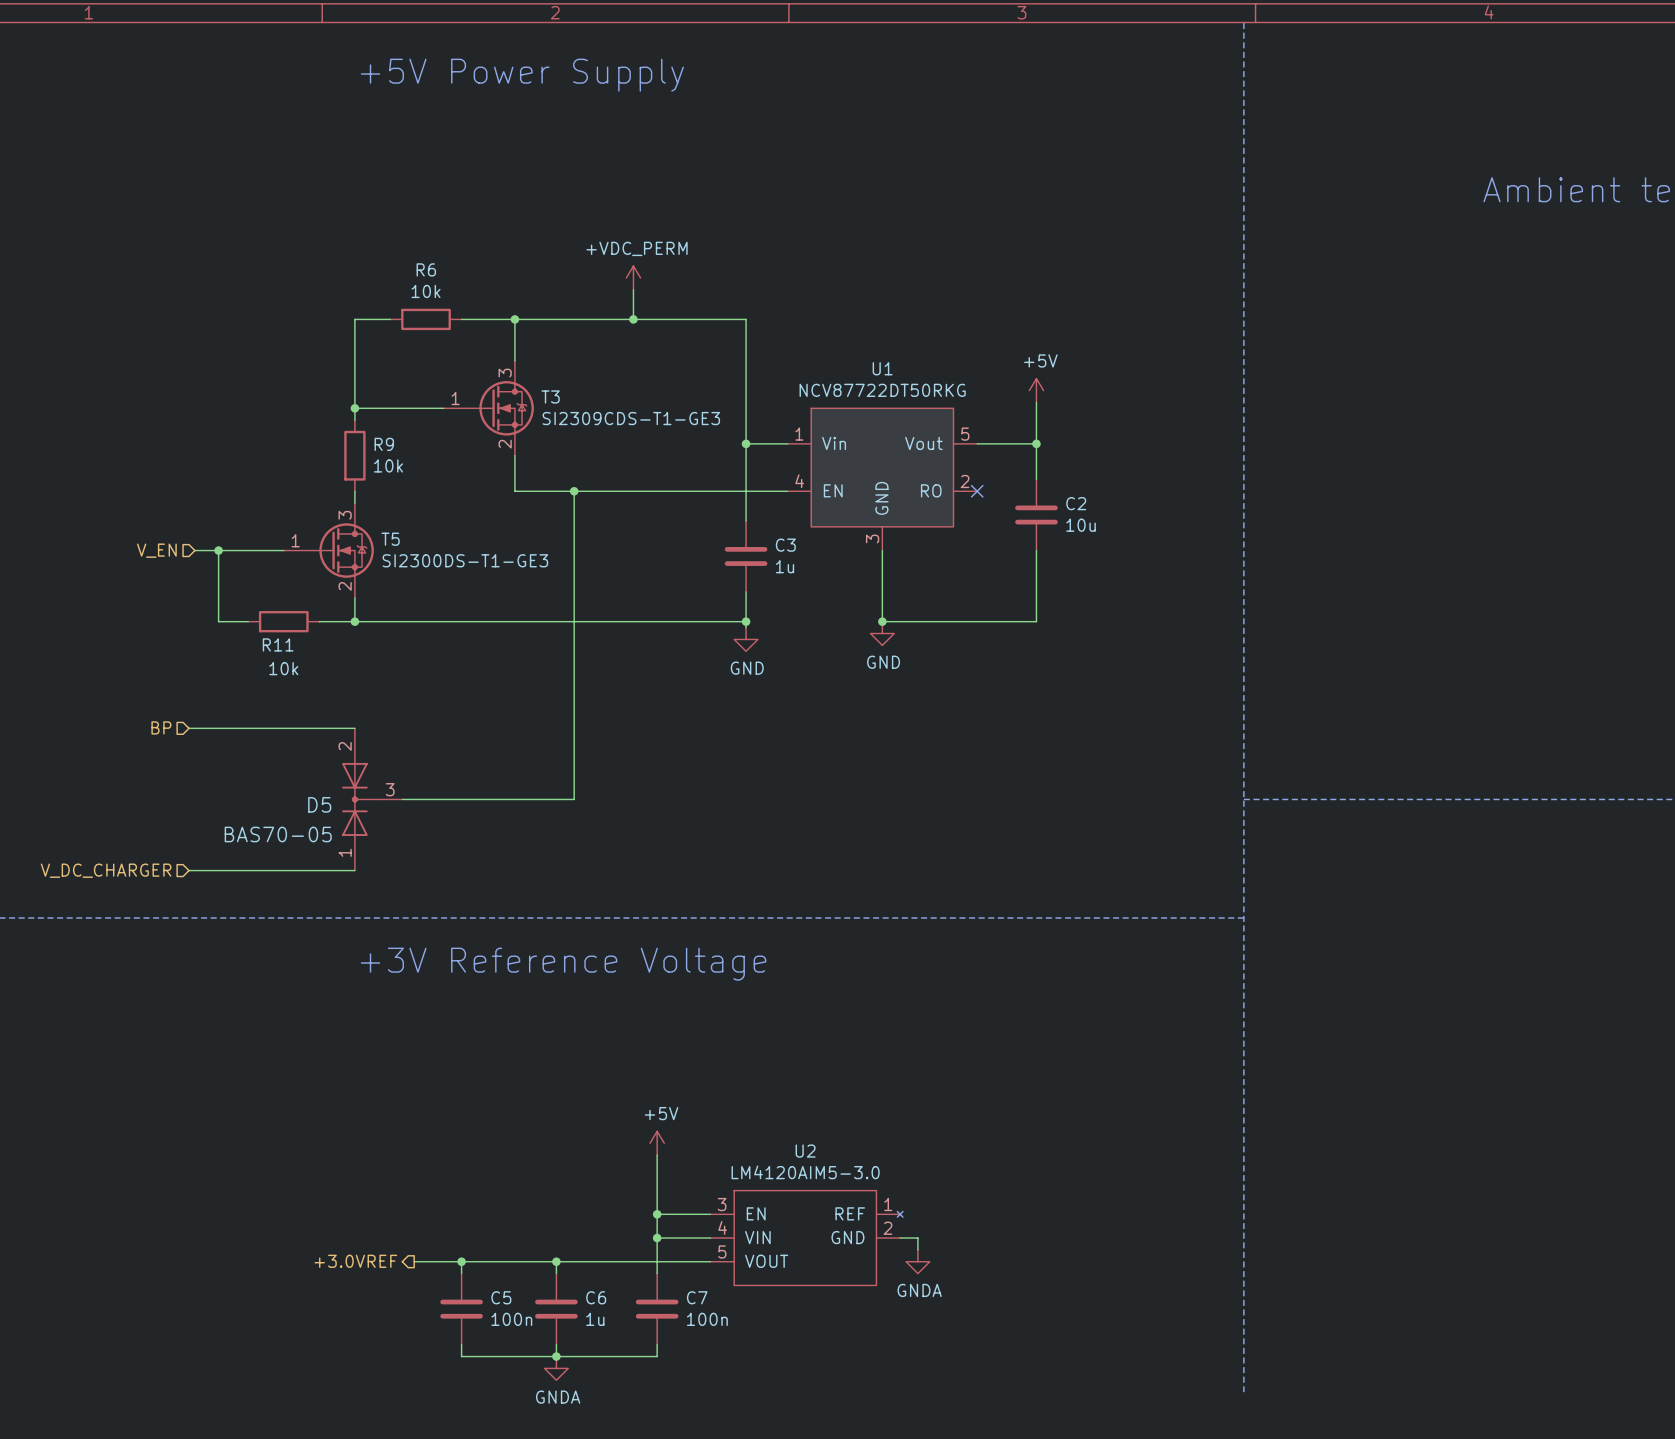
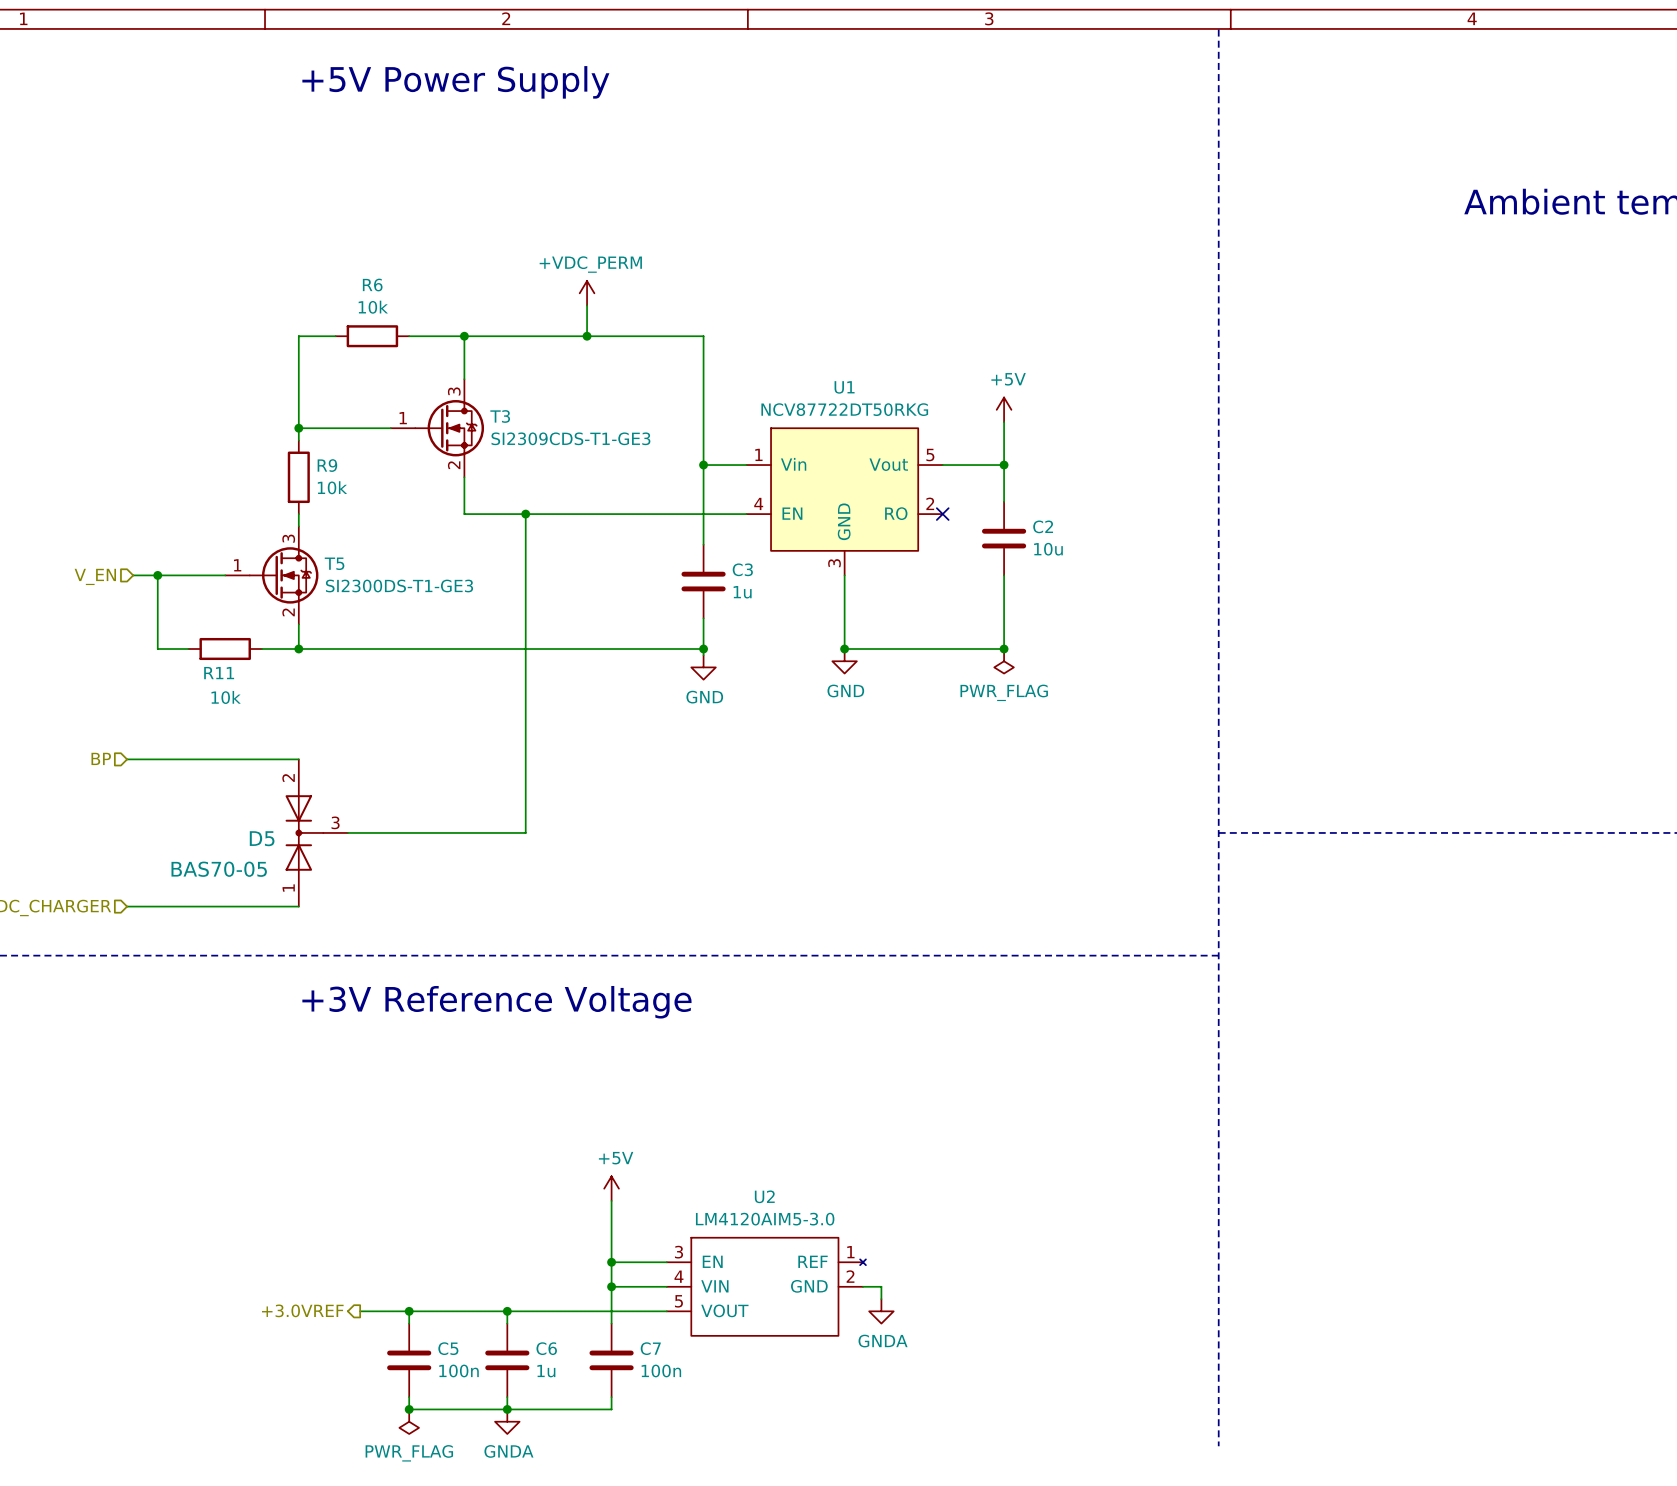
junction: none -> (1004, 649)
power symbol: none -> PWR_FLAG (1004, 661)
junction: none -> (409, 1409)
power symbol: none -> PWR_FLAG (409, 1421)

